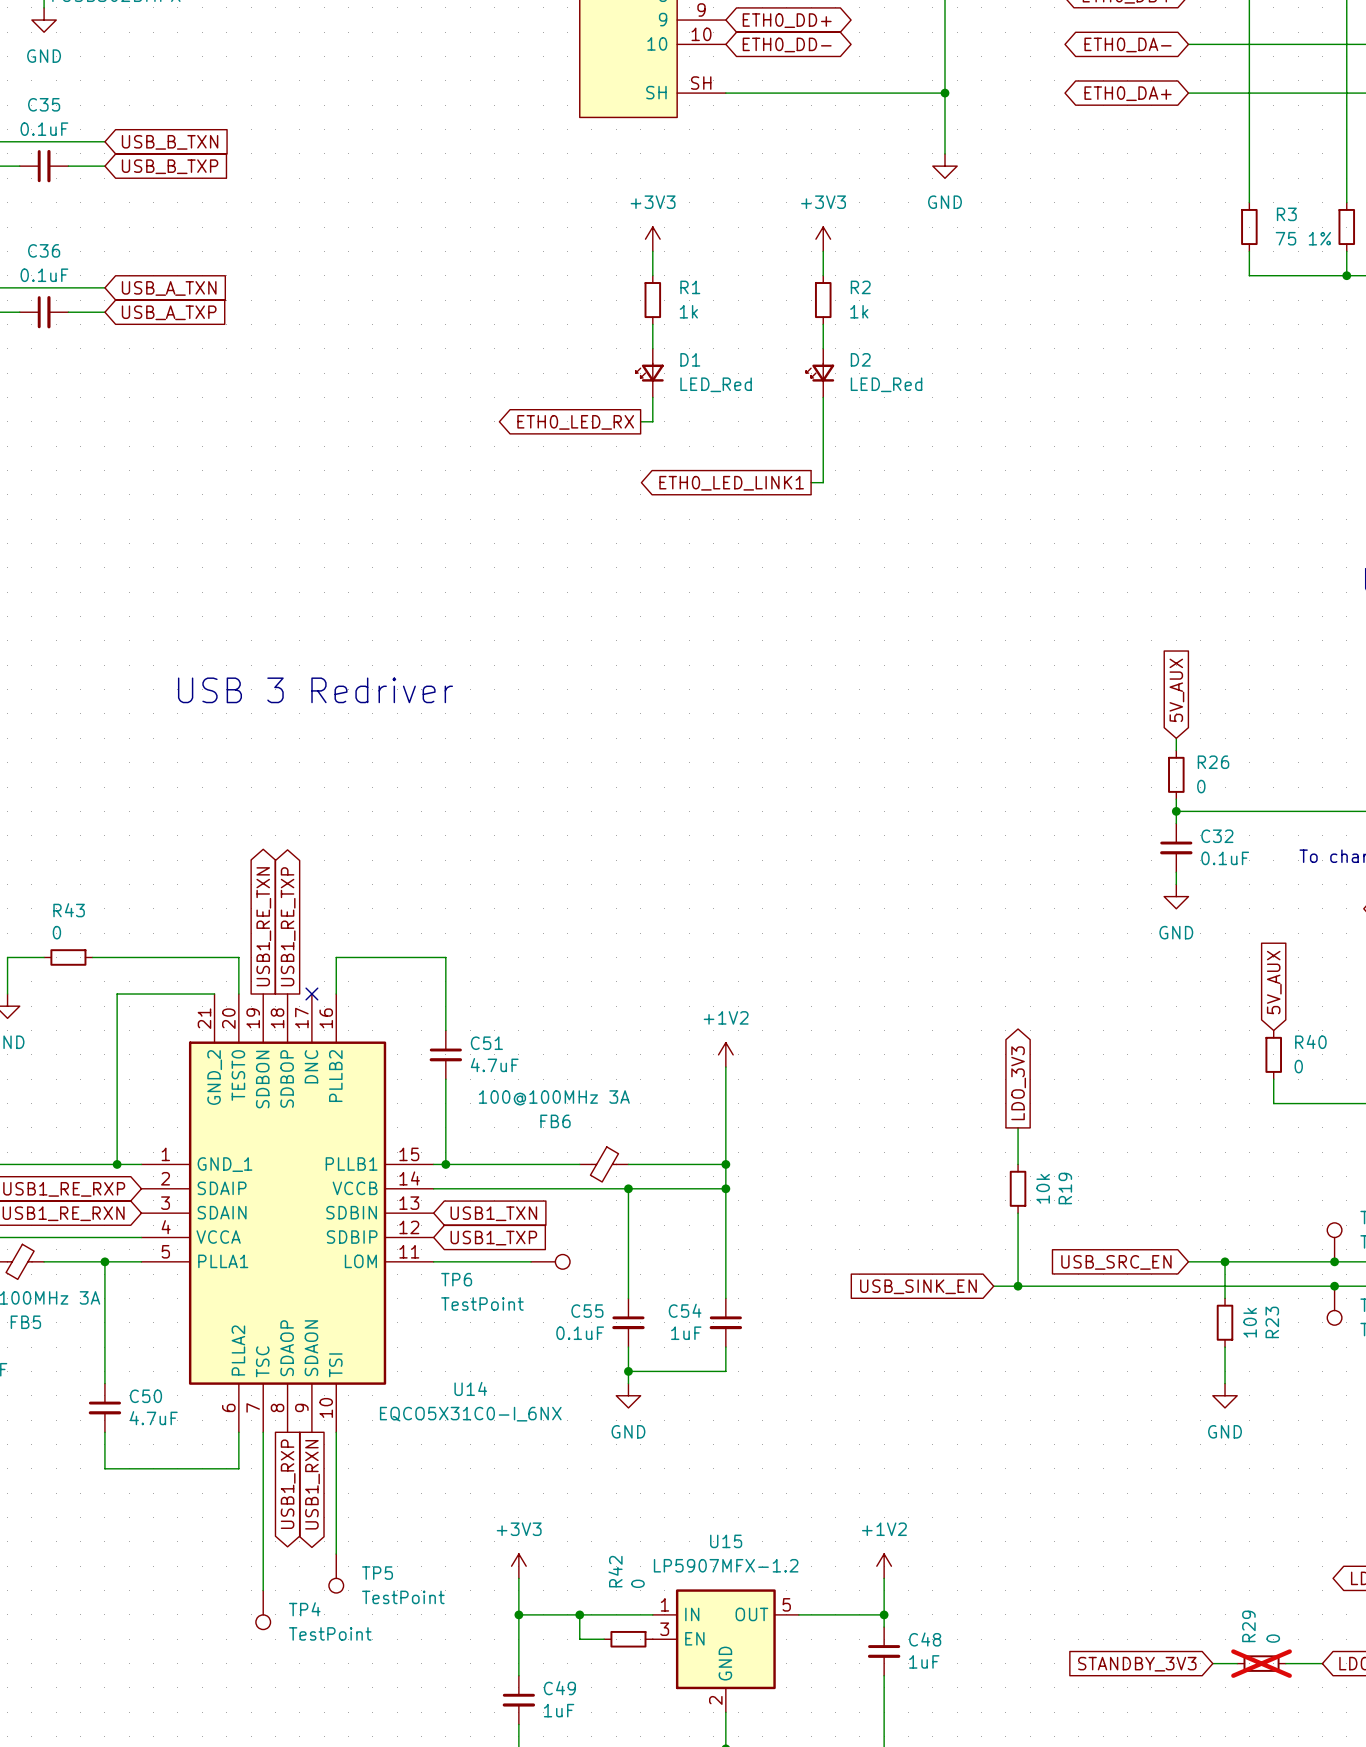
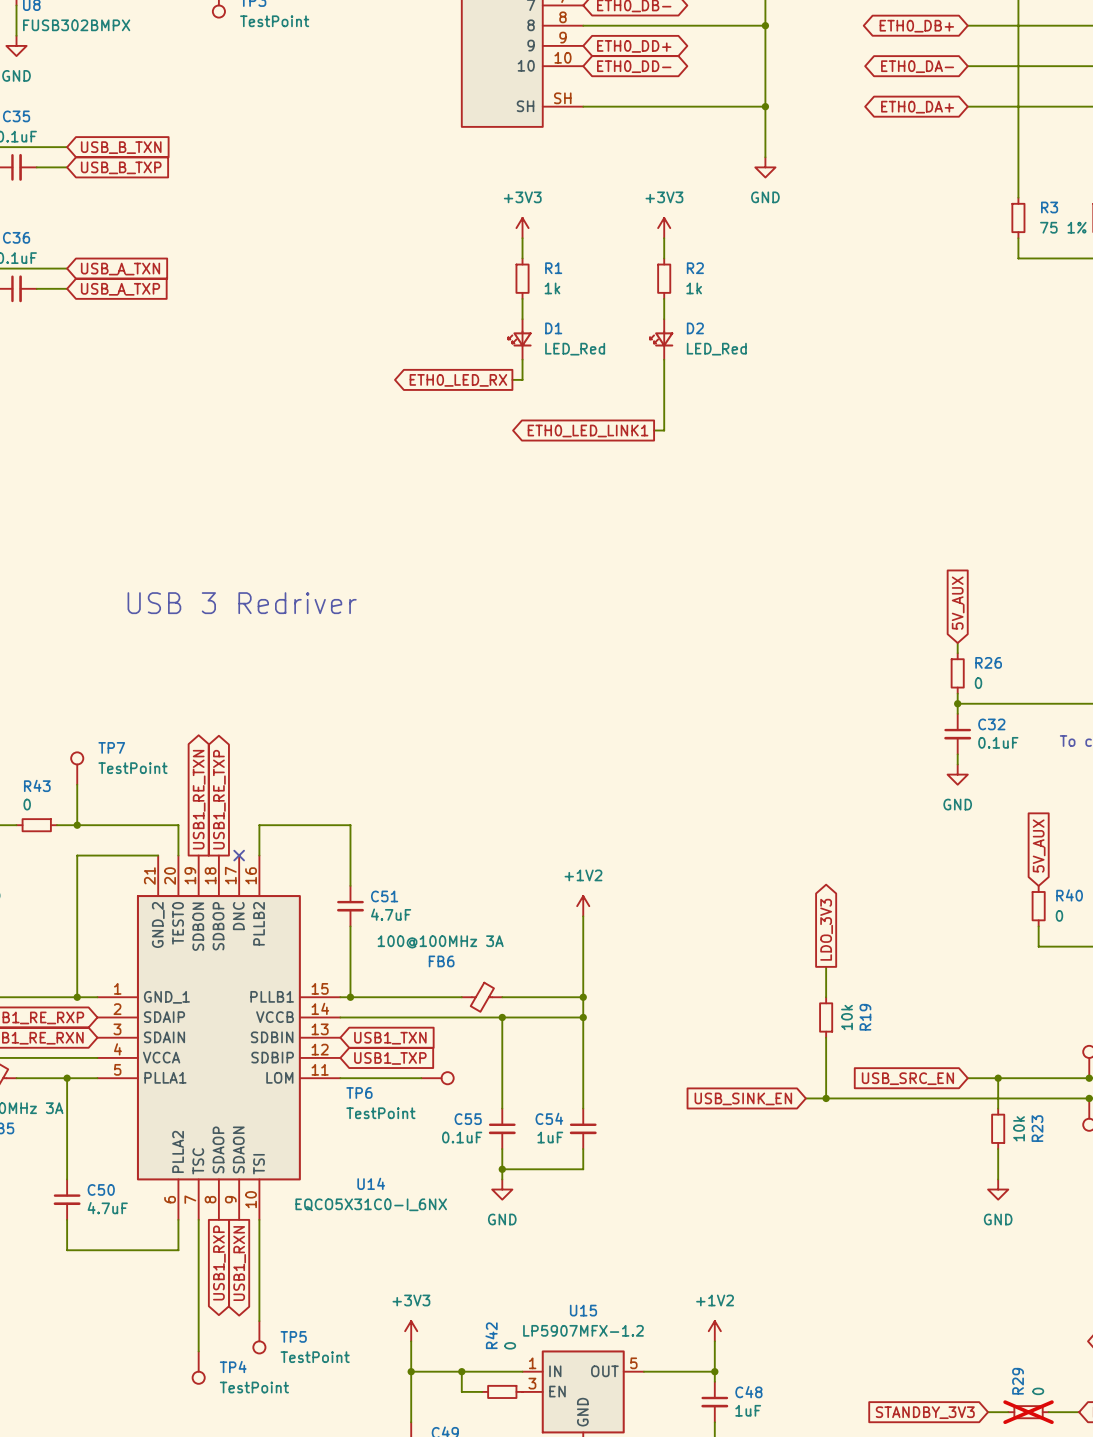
TP7: none -> TestPoint (77, 768)
wire: none -> (77, 784) (77, 825)
junction: none -> (77, 825)

